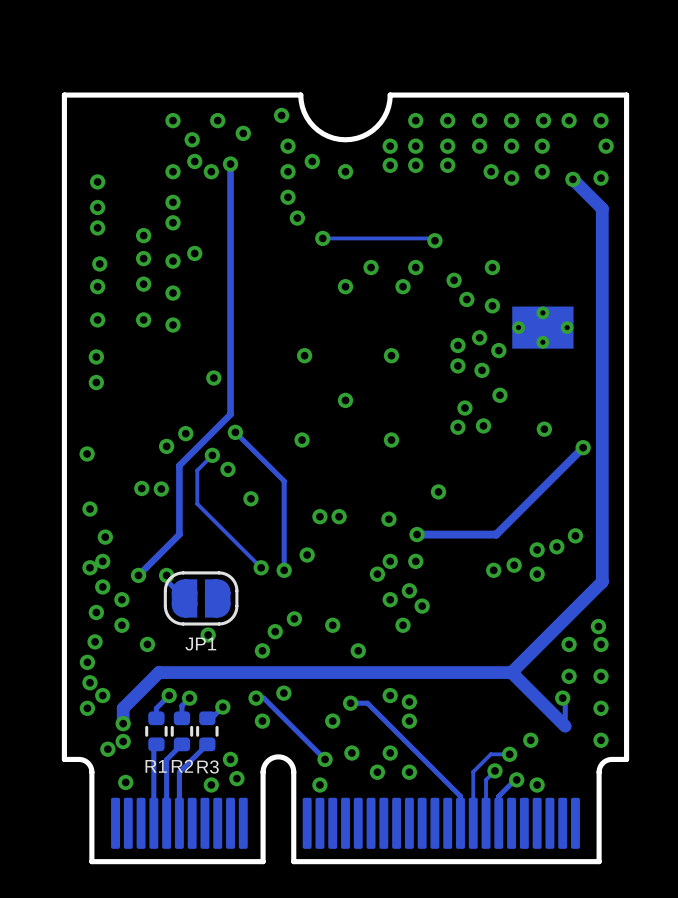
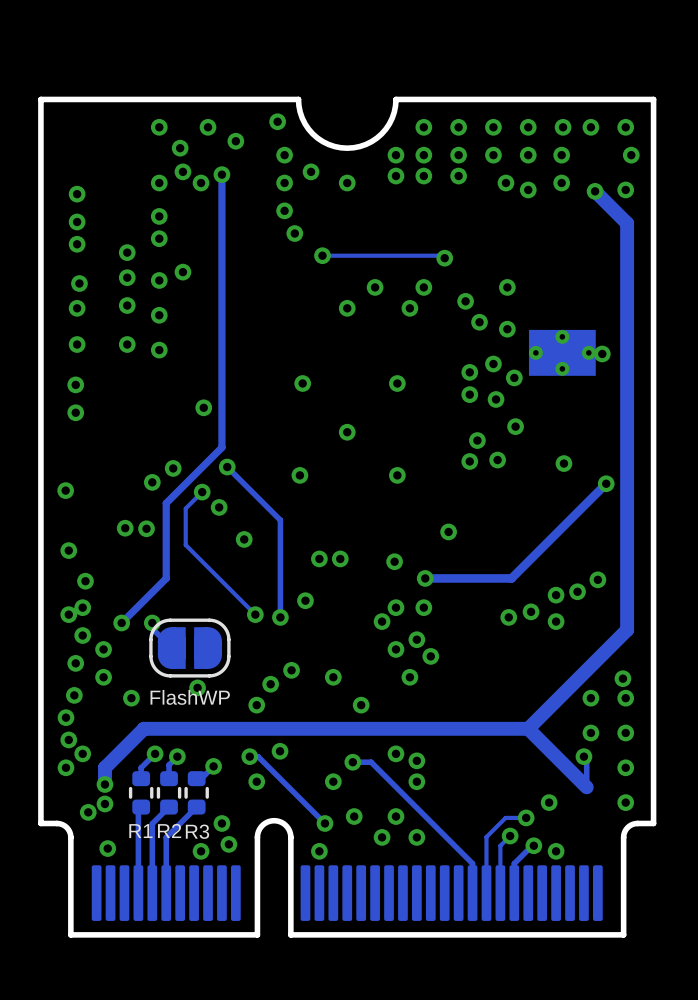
via: none -> (602, 353)
JP1 name: JP1 (200, 644) -> FlashWP (190, 697)

